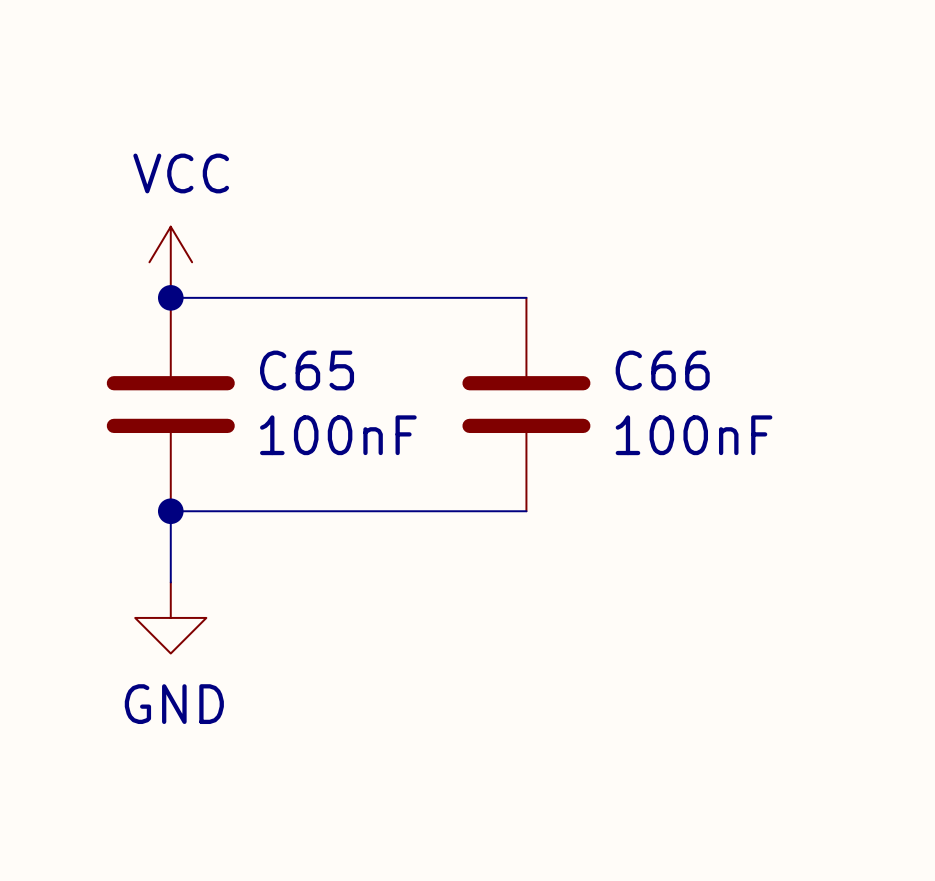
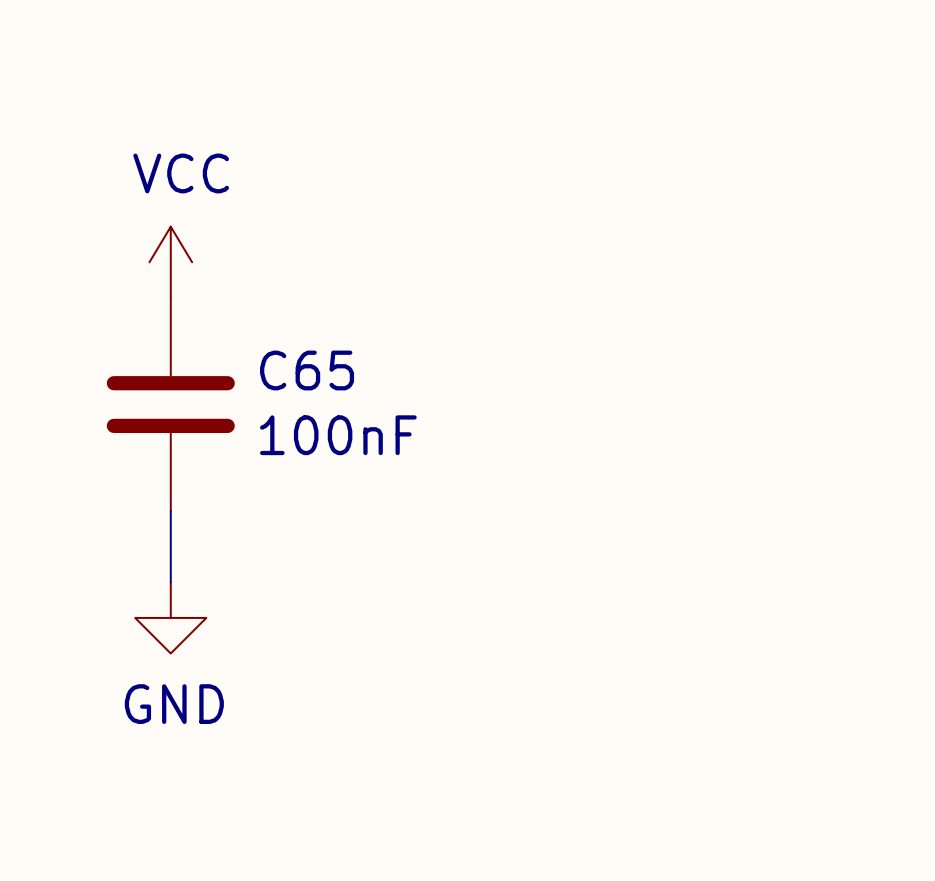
wire: (170, 297) (526, 297) -> none
junction: (170, 297) -> none
C66: 100nF (526, 404) -> none
wire: (170, 511) (526, 511) -> none
junction: (170, 511) -> none

